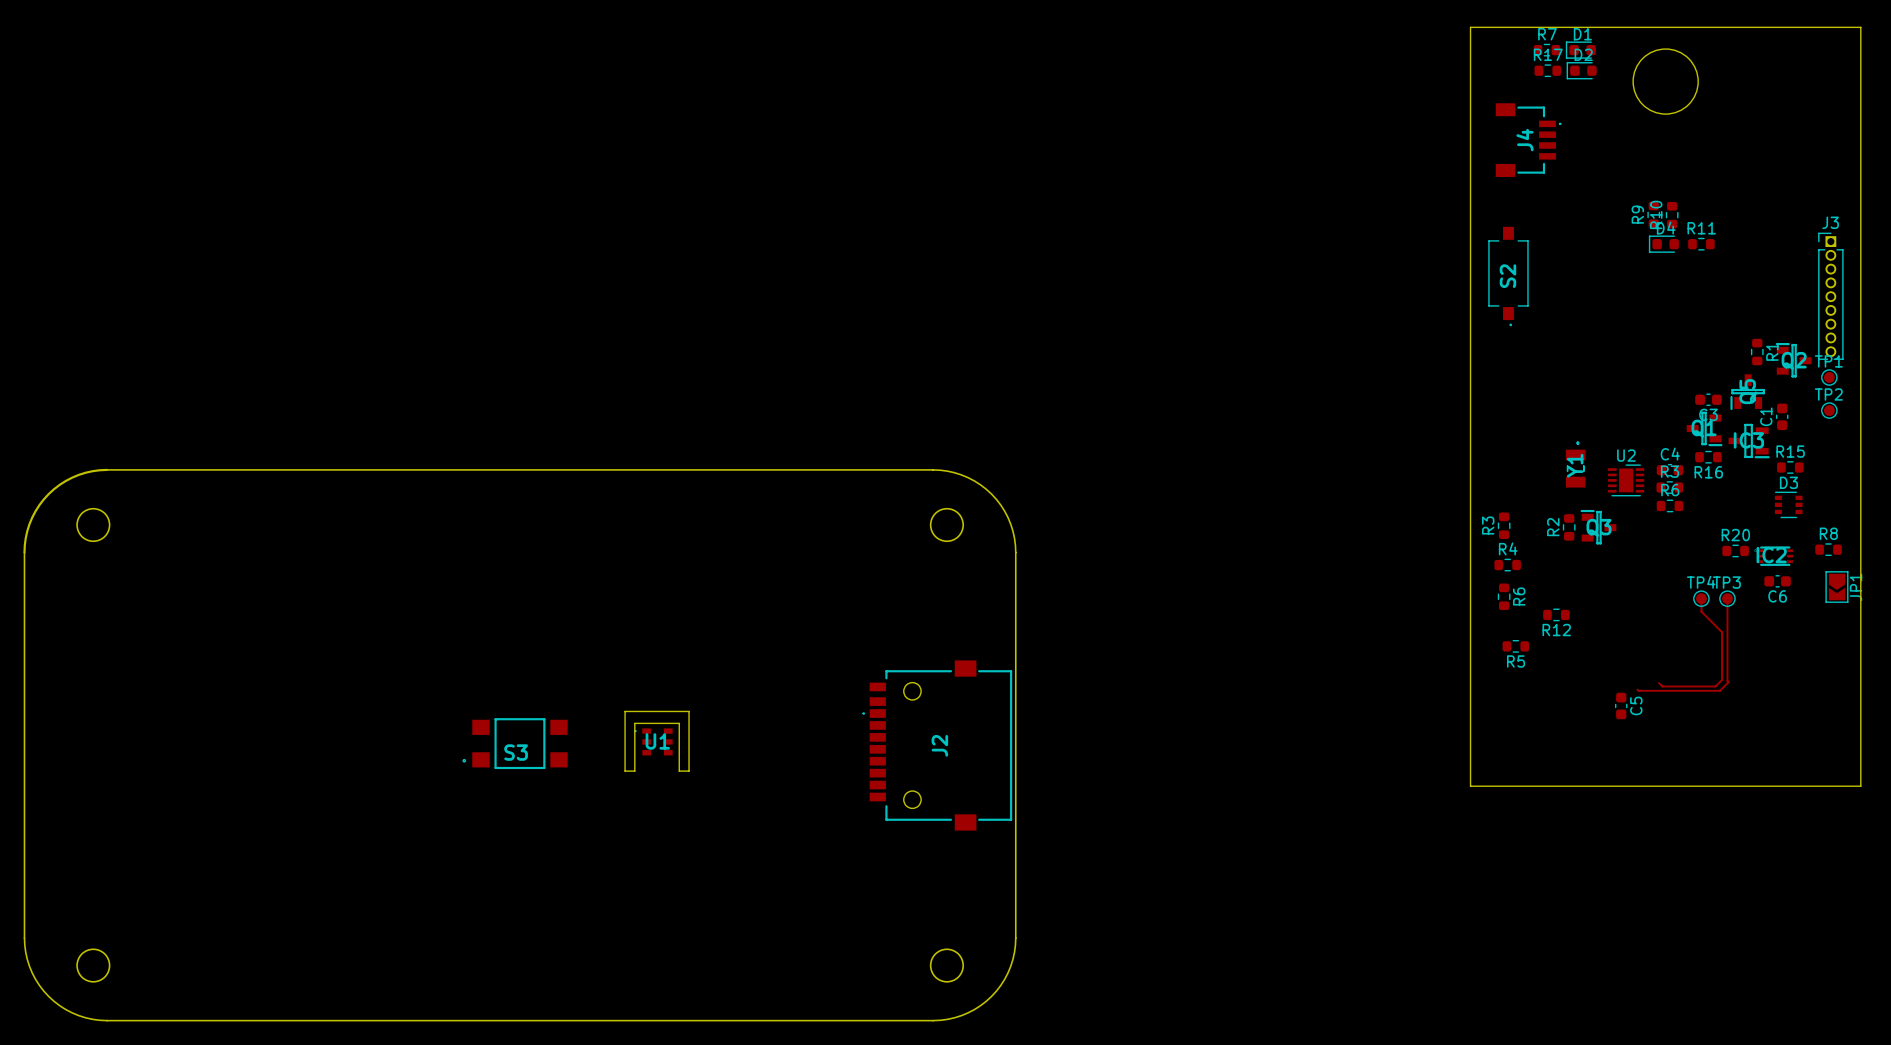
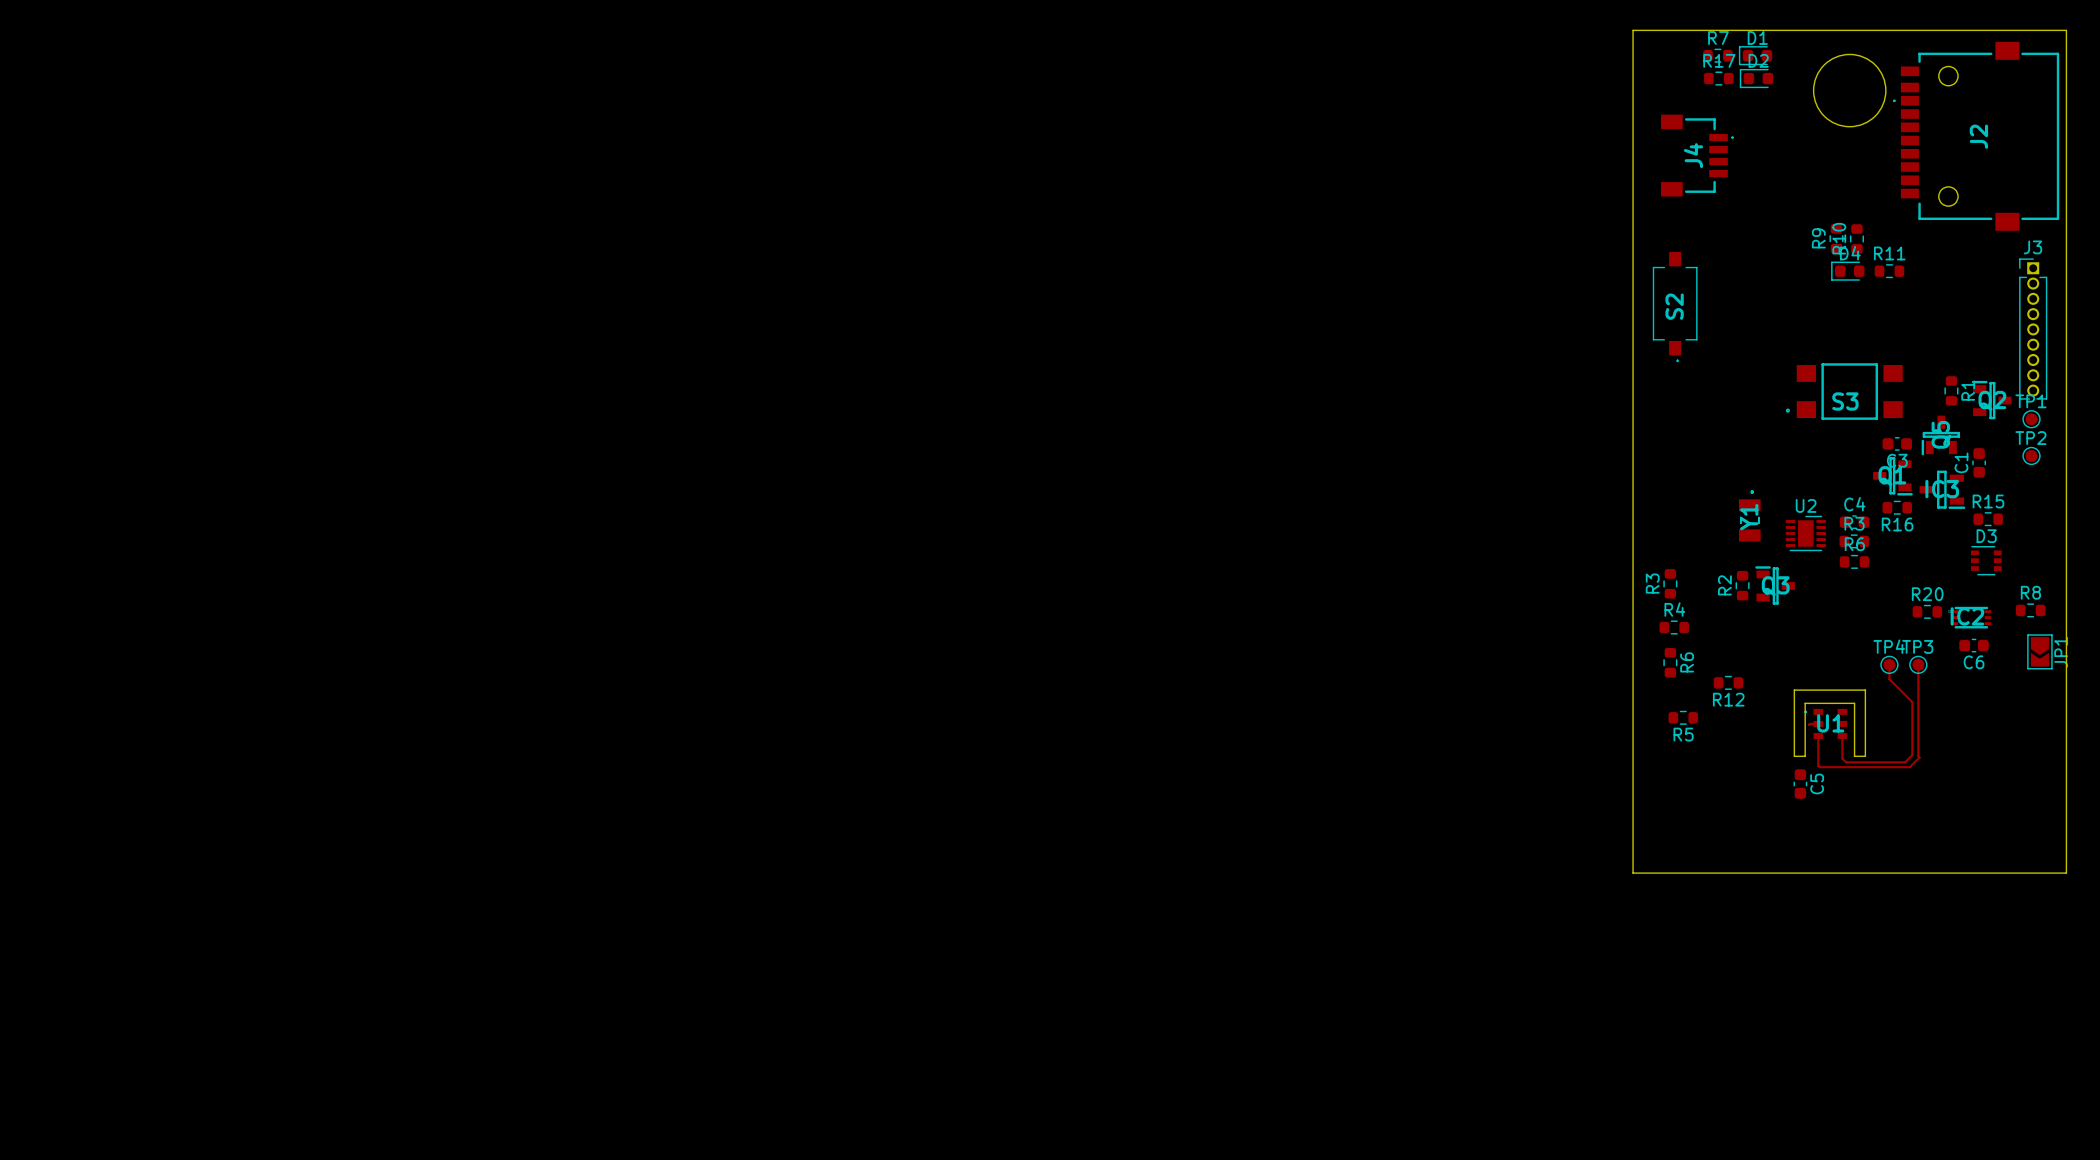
board edge: (107, 469) (933, 469) (954, 472) (974, 480) (991, 494) (1000, 505) (1010, 524) (1015, 545) (1015, 938) (1012, 959) (1004, 979) (991, 996) (974, 1009) (954, 1017) (933, 1020) (107, 1020) (85, 1017) (65, 1009) (48, 996) (35, 979) (27, 959) (24, 945) (24, 545) (32, 517) (48, 494) (72, 477) (92, 471) (107, 469) -> none
round board edge: [76, 507, 111, 543] -> none
round board edge: [929, 507, 965, 543] -> none
board edge: none -> (1794, 690) (1794, 756) (1805, 756) (1805, 703) (1854, 703) (1854, 756) (1865, 756) (1865, 690) (1794, 690)
track: none -> (1818, 723) (1808, 725)
track: none -> (1818, 735) (1818, 765)
track: none -> (1842, 735) (1842, 758)
board edge: (625, 711) (625, 771) (634, 771) (634, 723) (679, 723) (679, 771) (689, 771) (689, 711) (625, 711) -> none
U1 position: (653, 741) -> (1825, 723)
S3 position: (515, 743) -> (1844, 391)
J2 position: (937, 745) -> (1976, 136)
round board edge: [76, 948, 111, 983] -> none
round board edge: [929, 948, 965, 983] -> none

